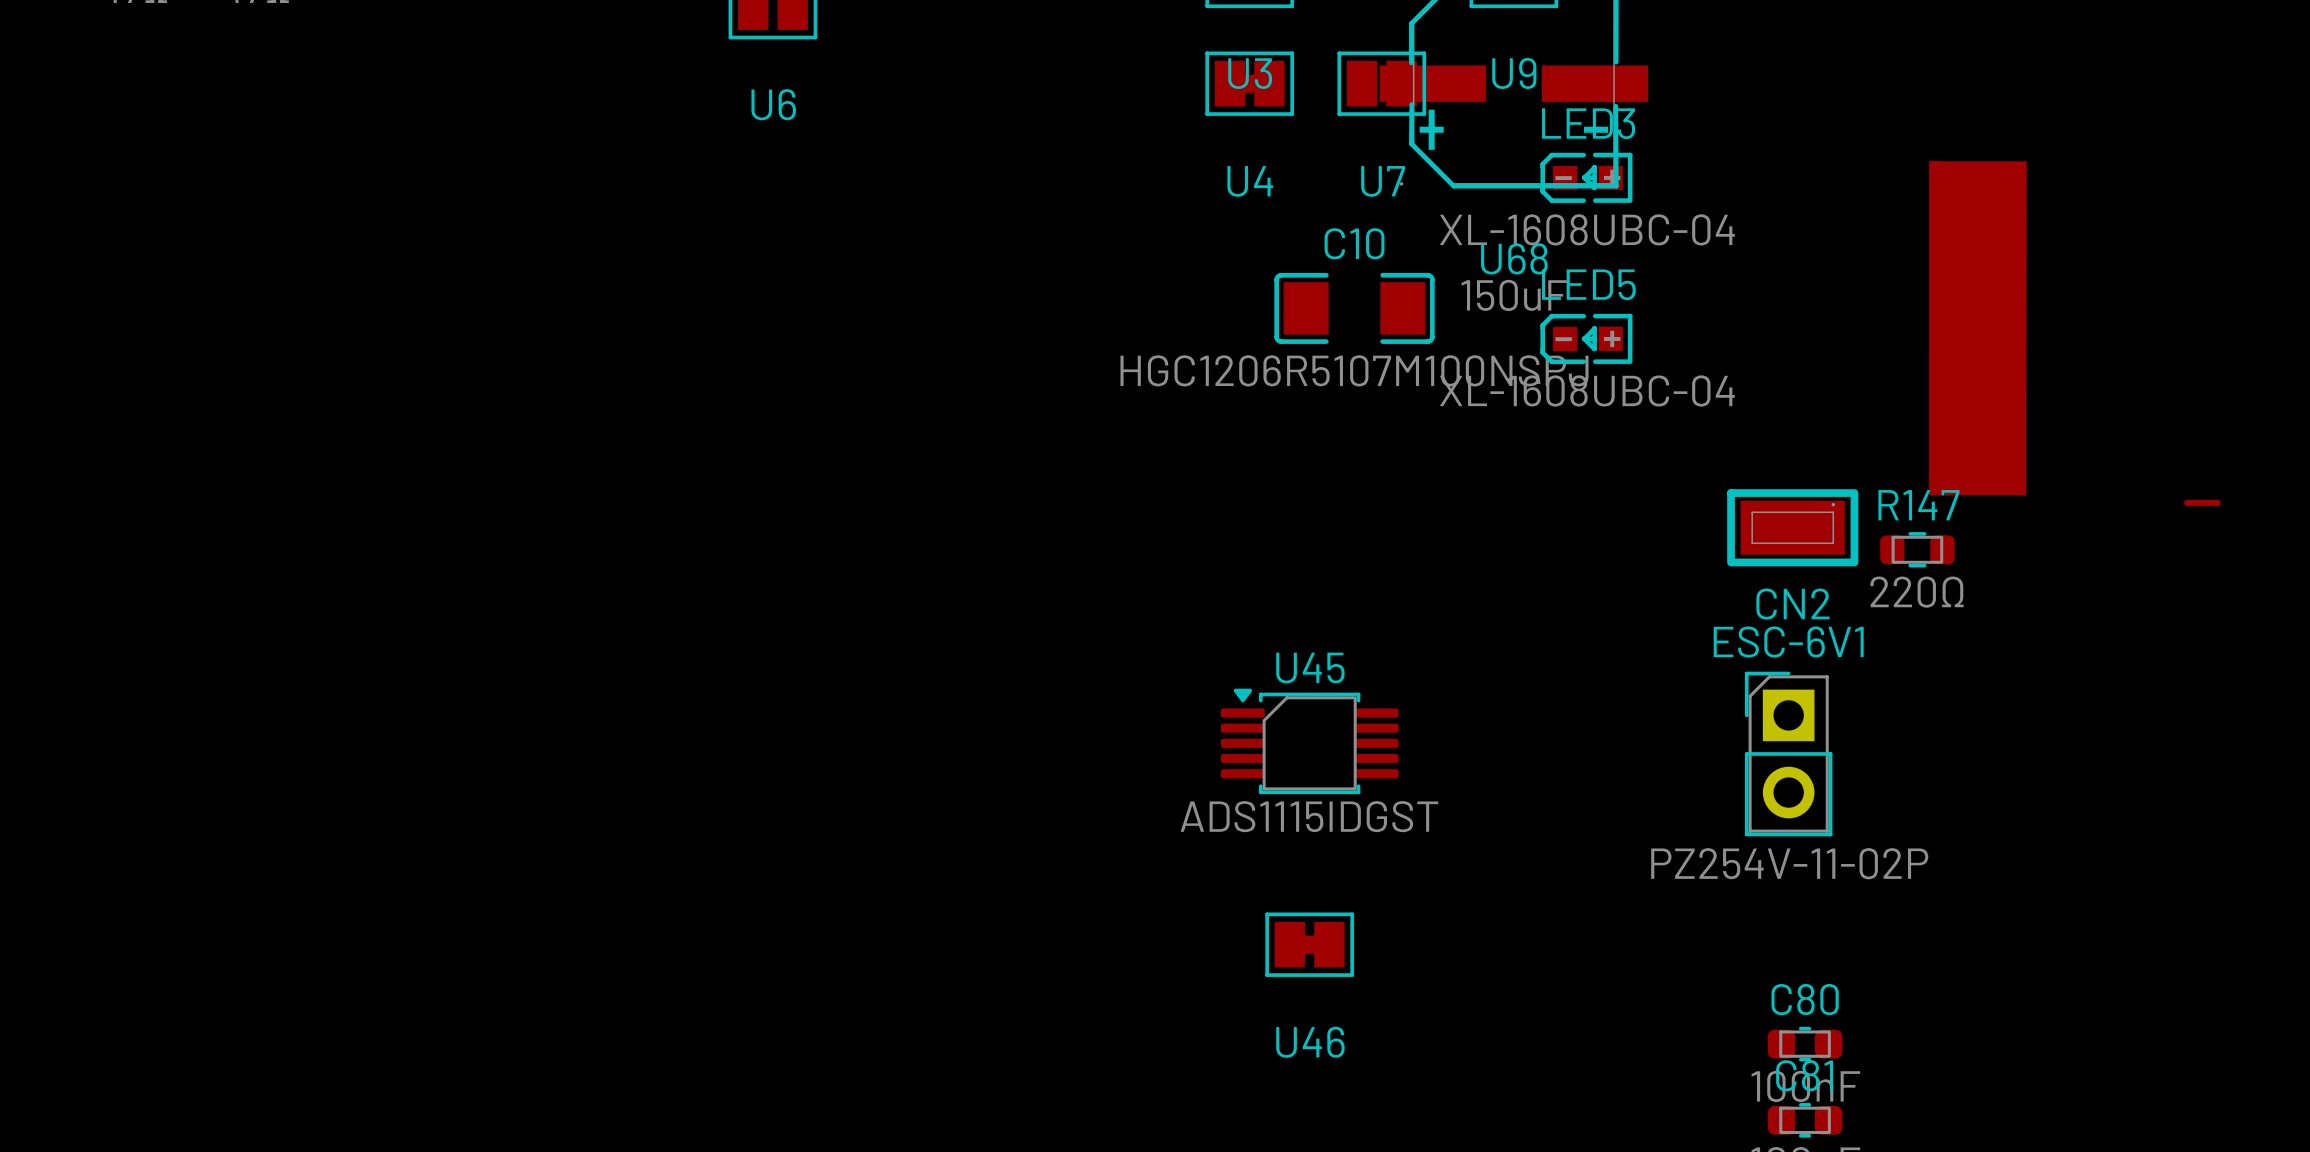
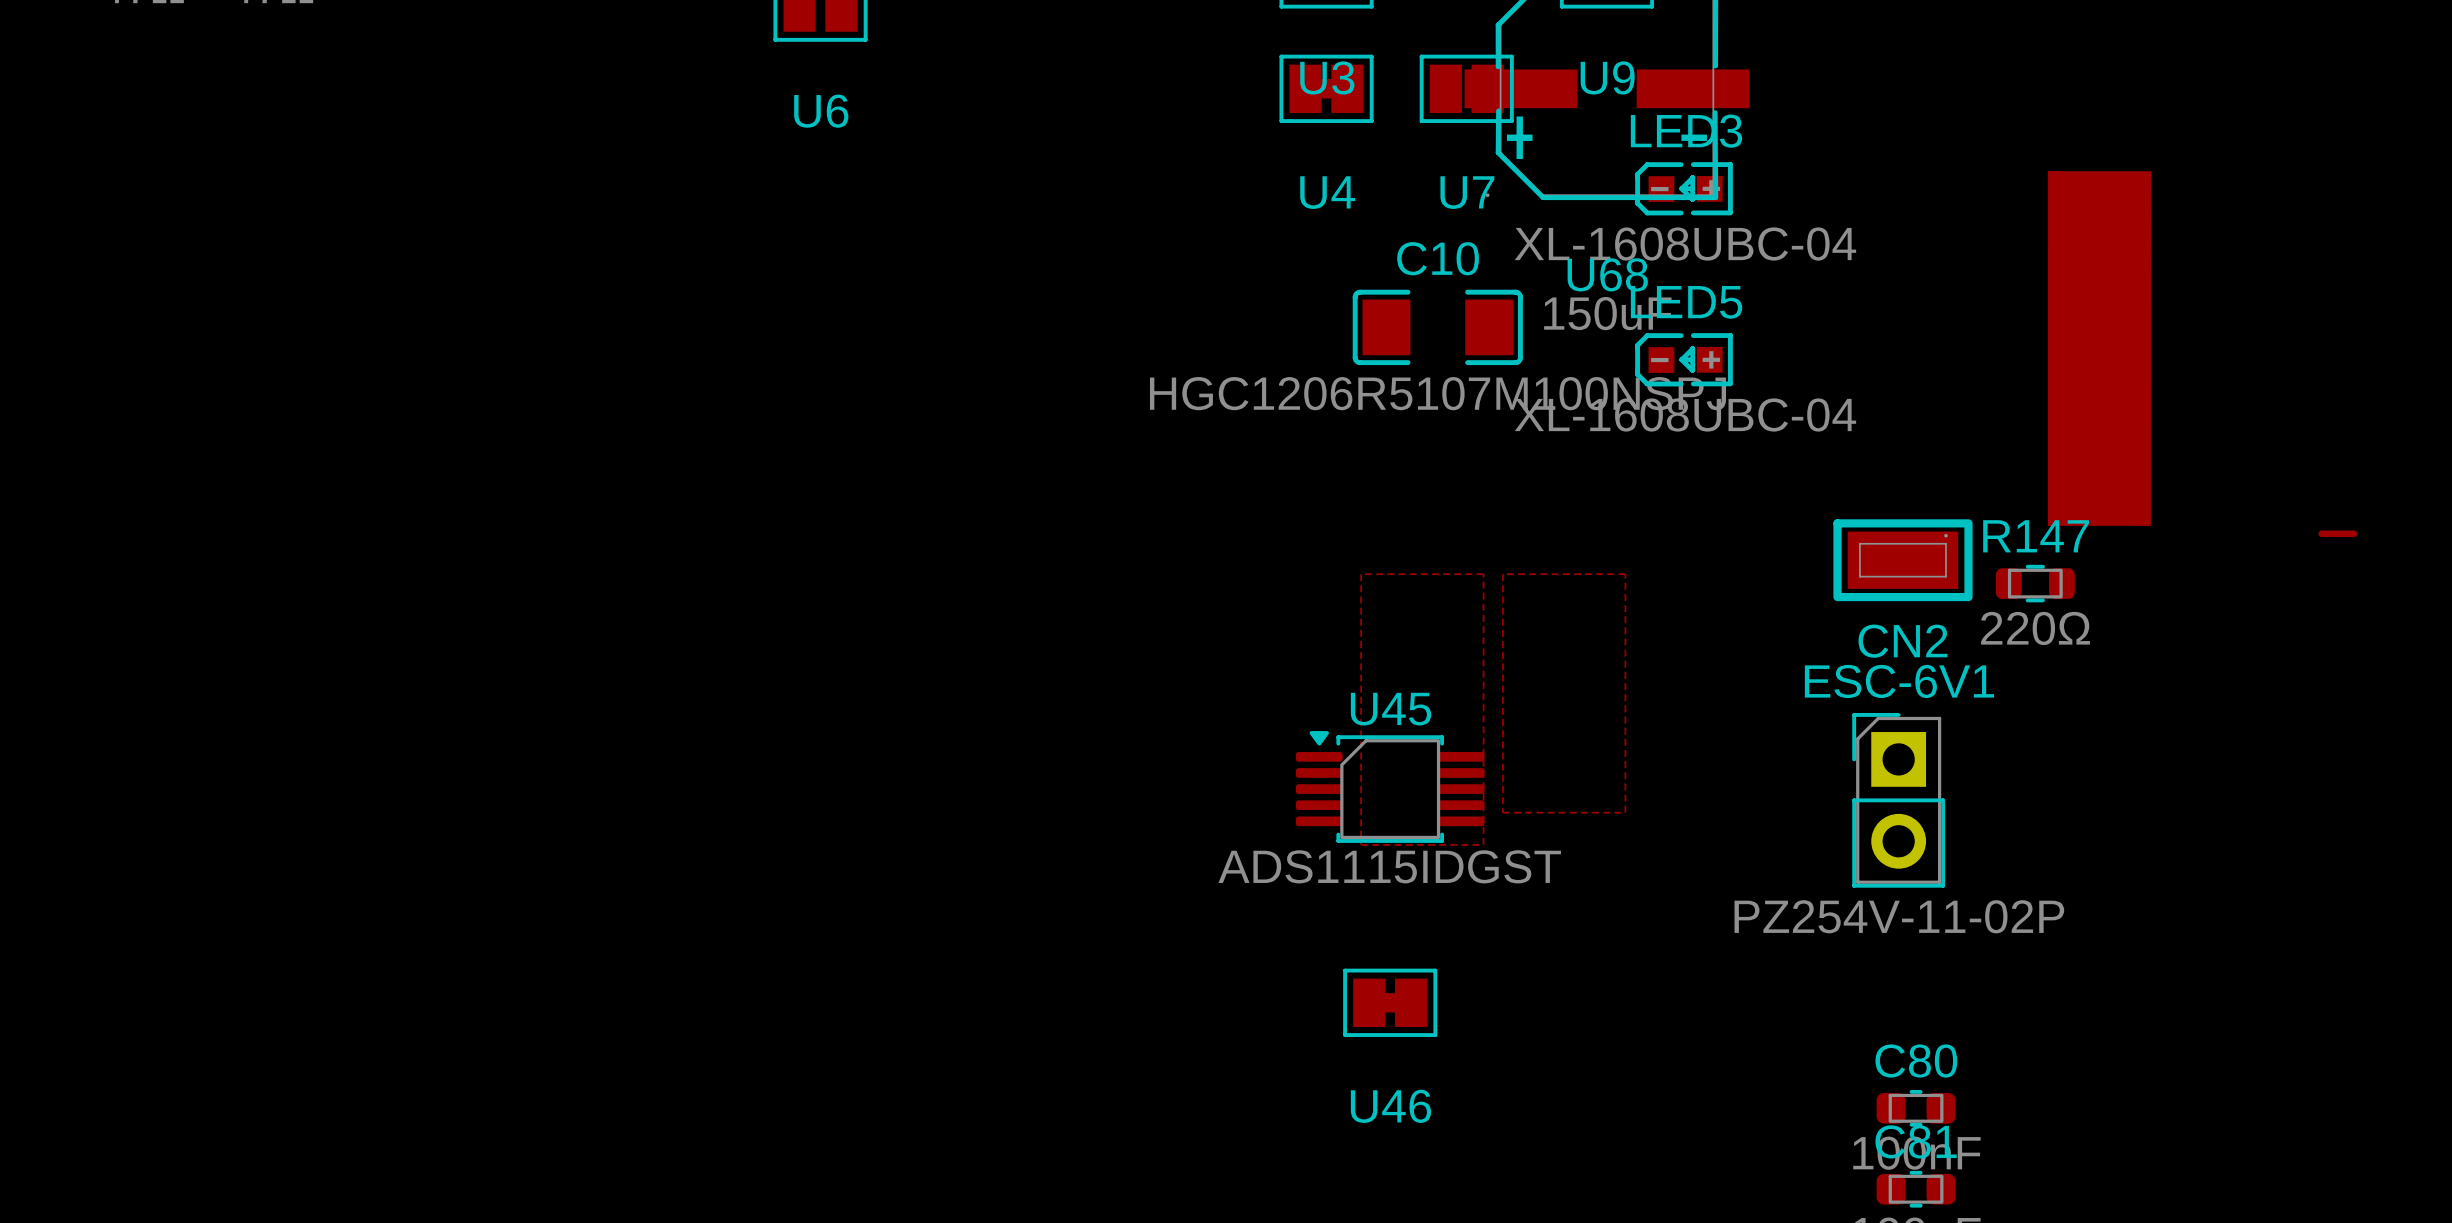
zone outline: none -> (1361, 574) (1483, 574) (1483, 844) (1361, 844) (1361, 574)
zone outline: none -> (1502, 574) (1502, 812) (1625, 812) (1625, 574) (1502, 574)

